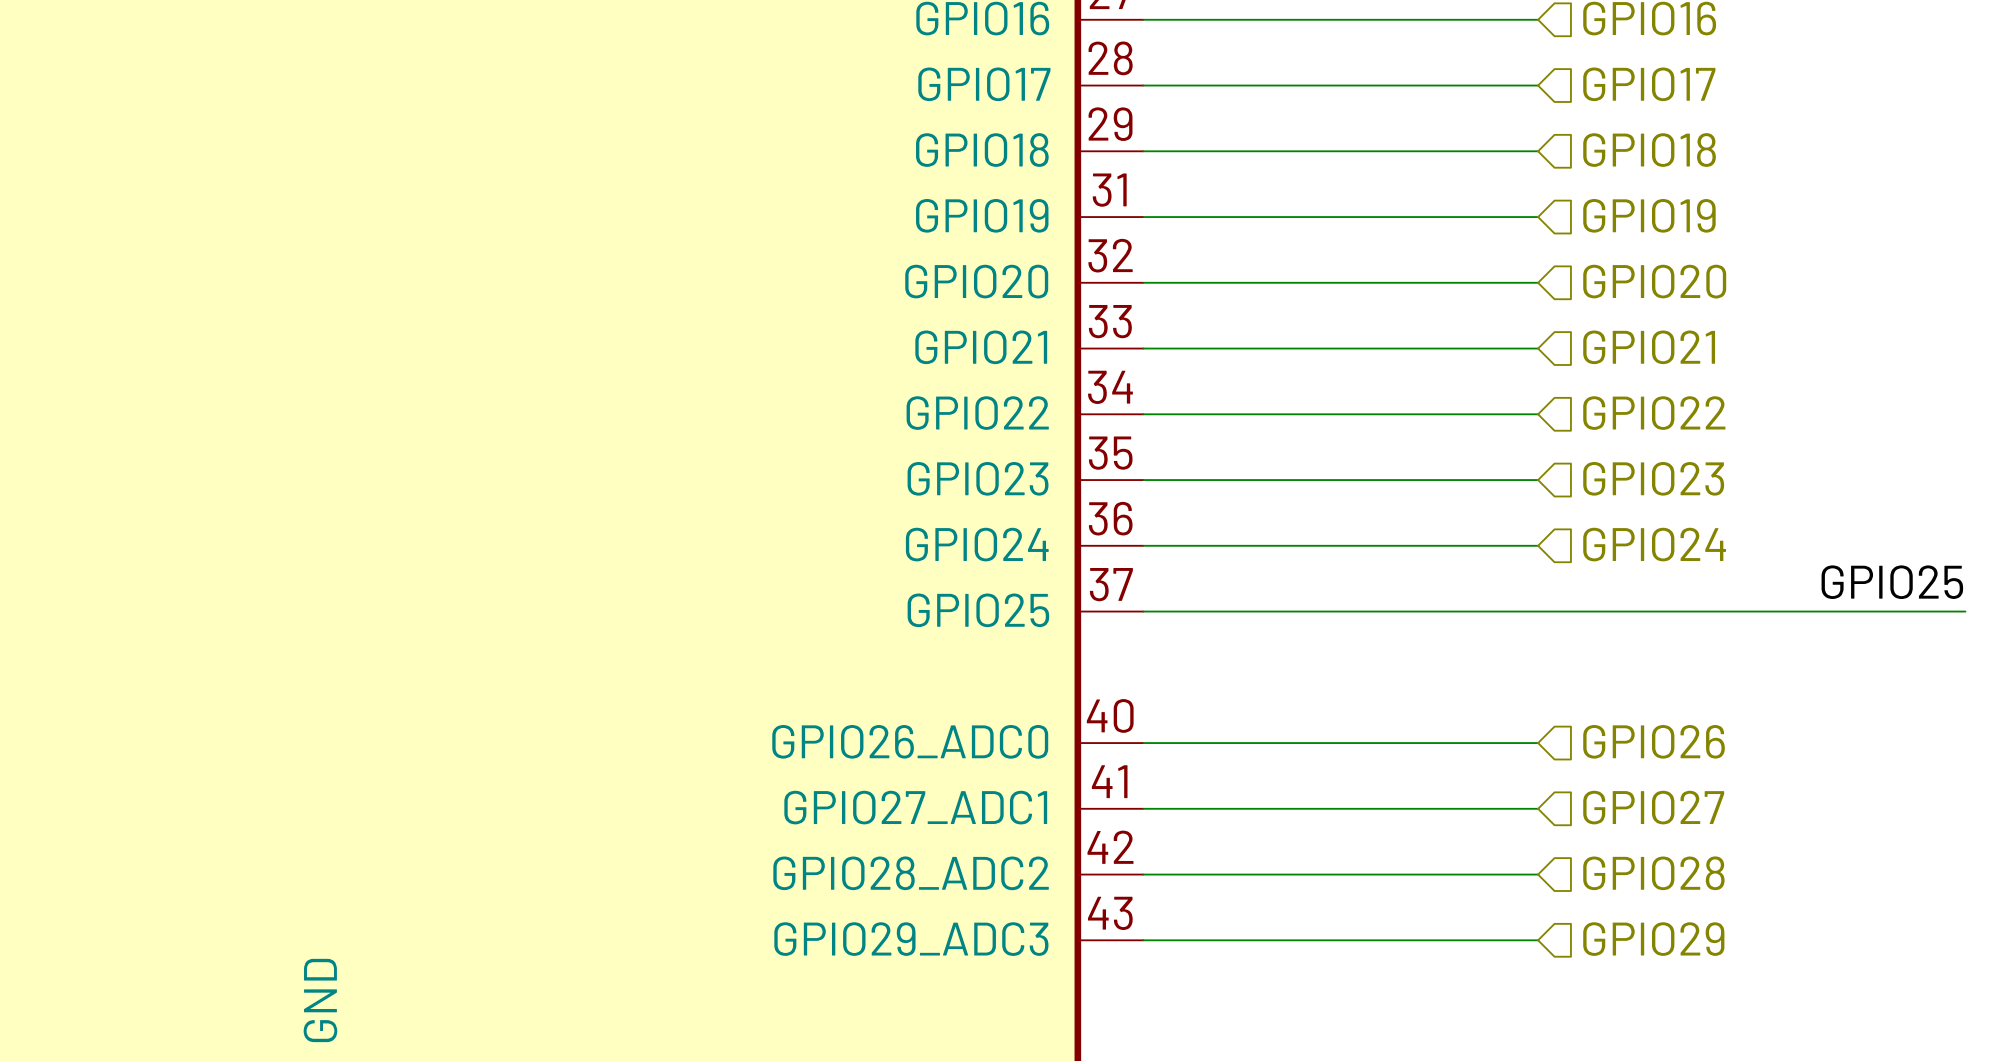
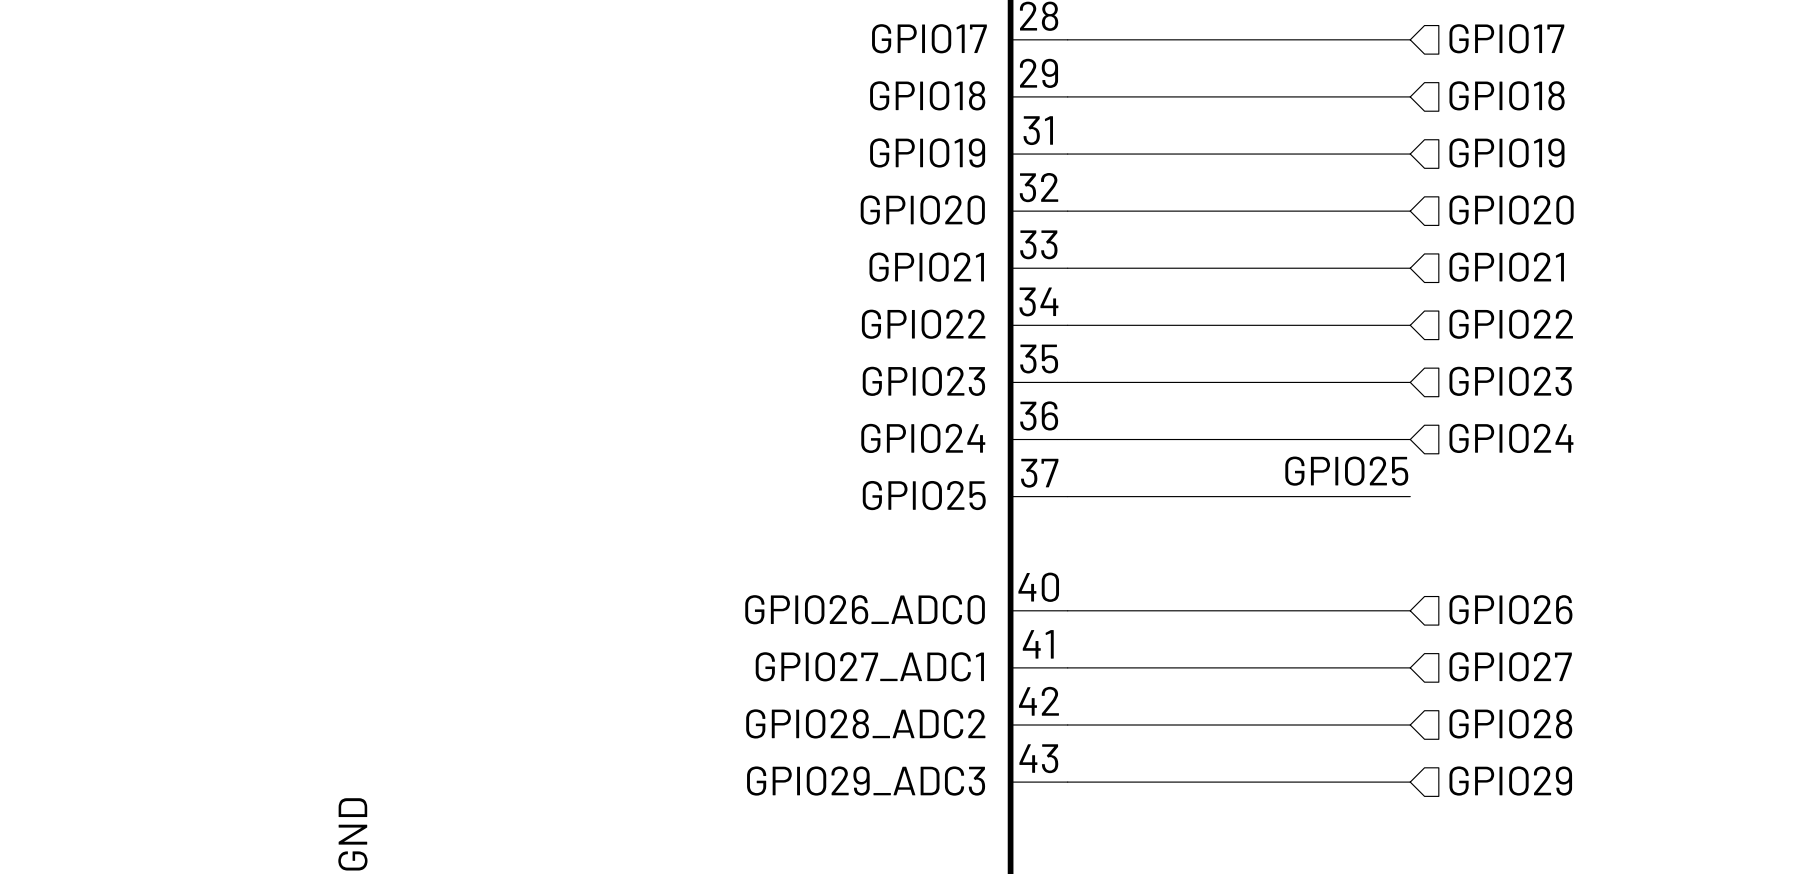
label position: GPIO25 (1892, 582) -> GPIO25 (1346, 471)
wire: (1538, 611) (1965, 611) -> none

